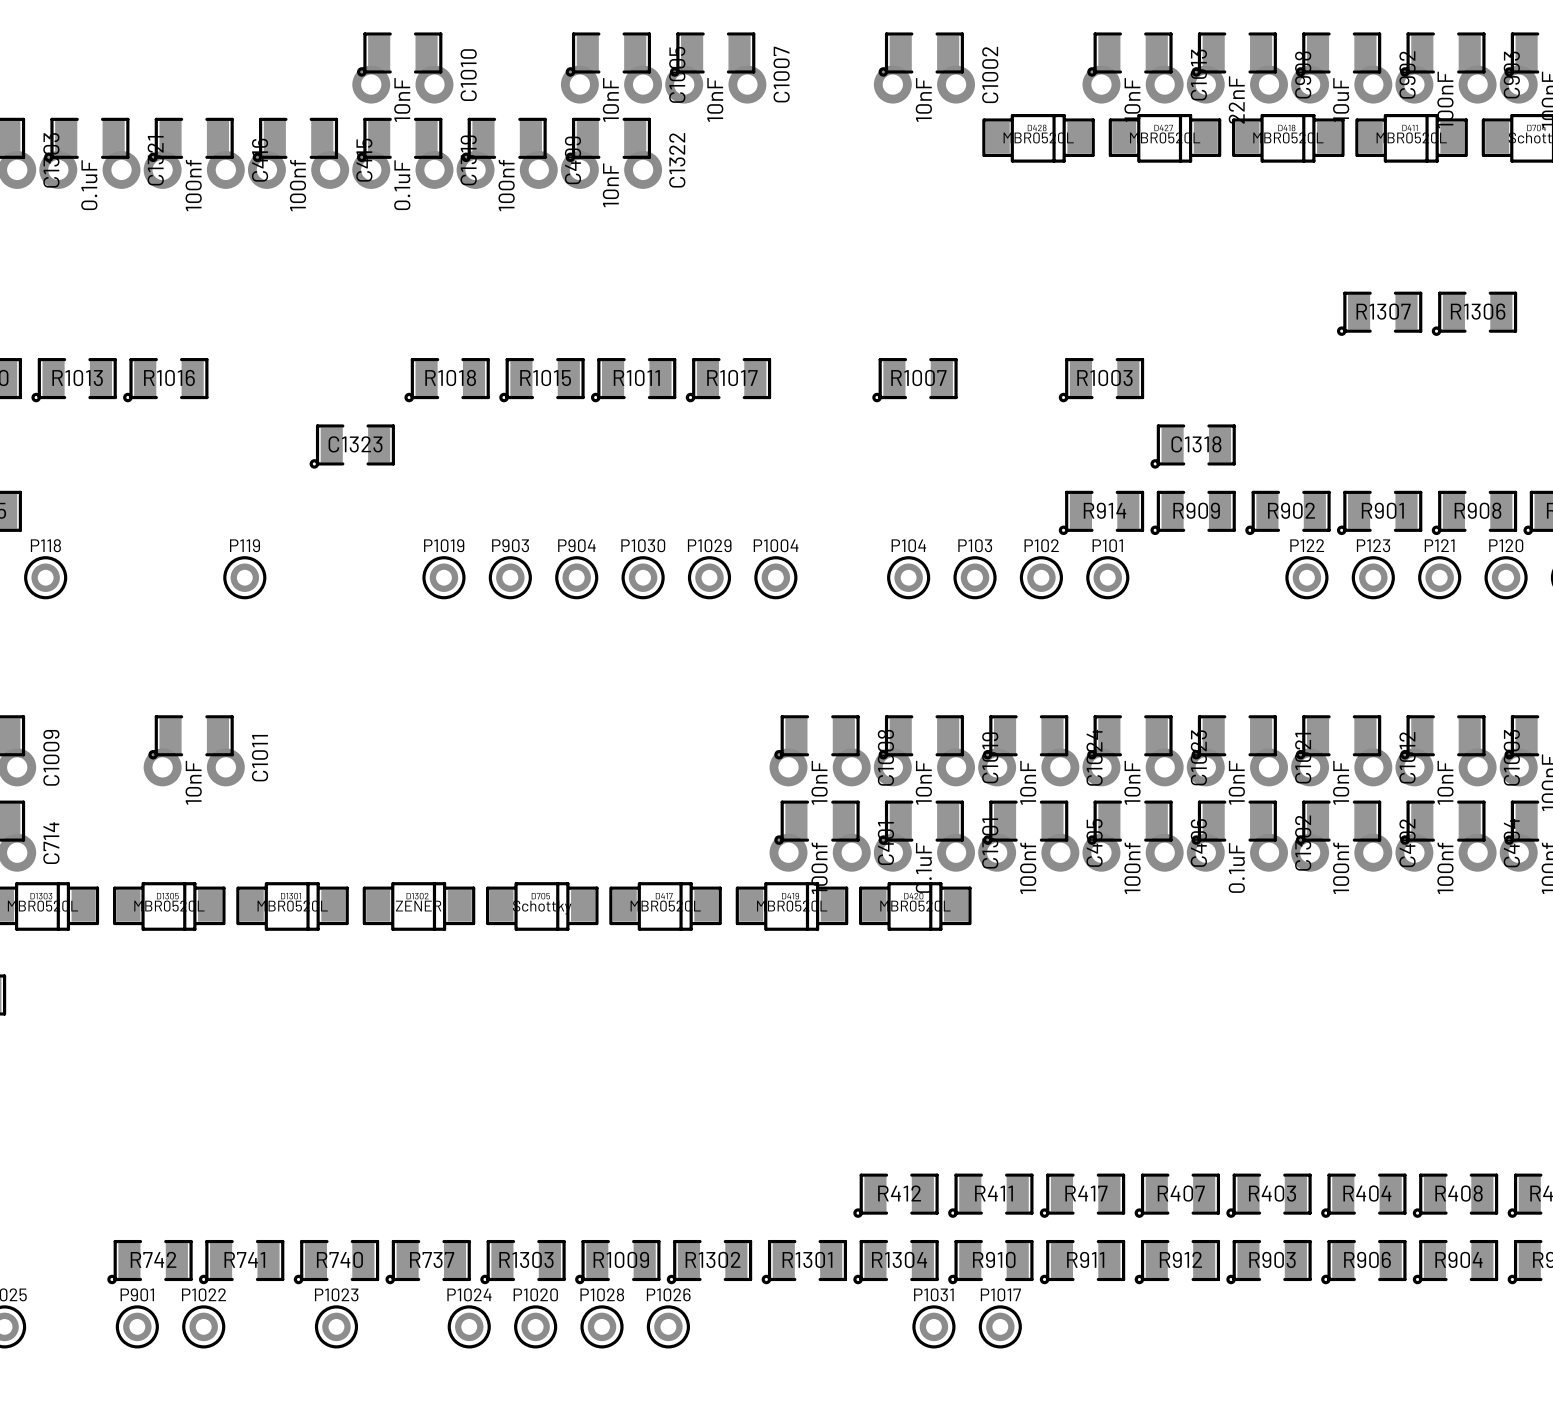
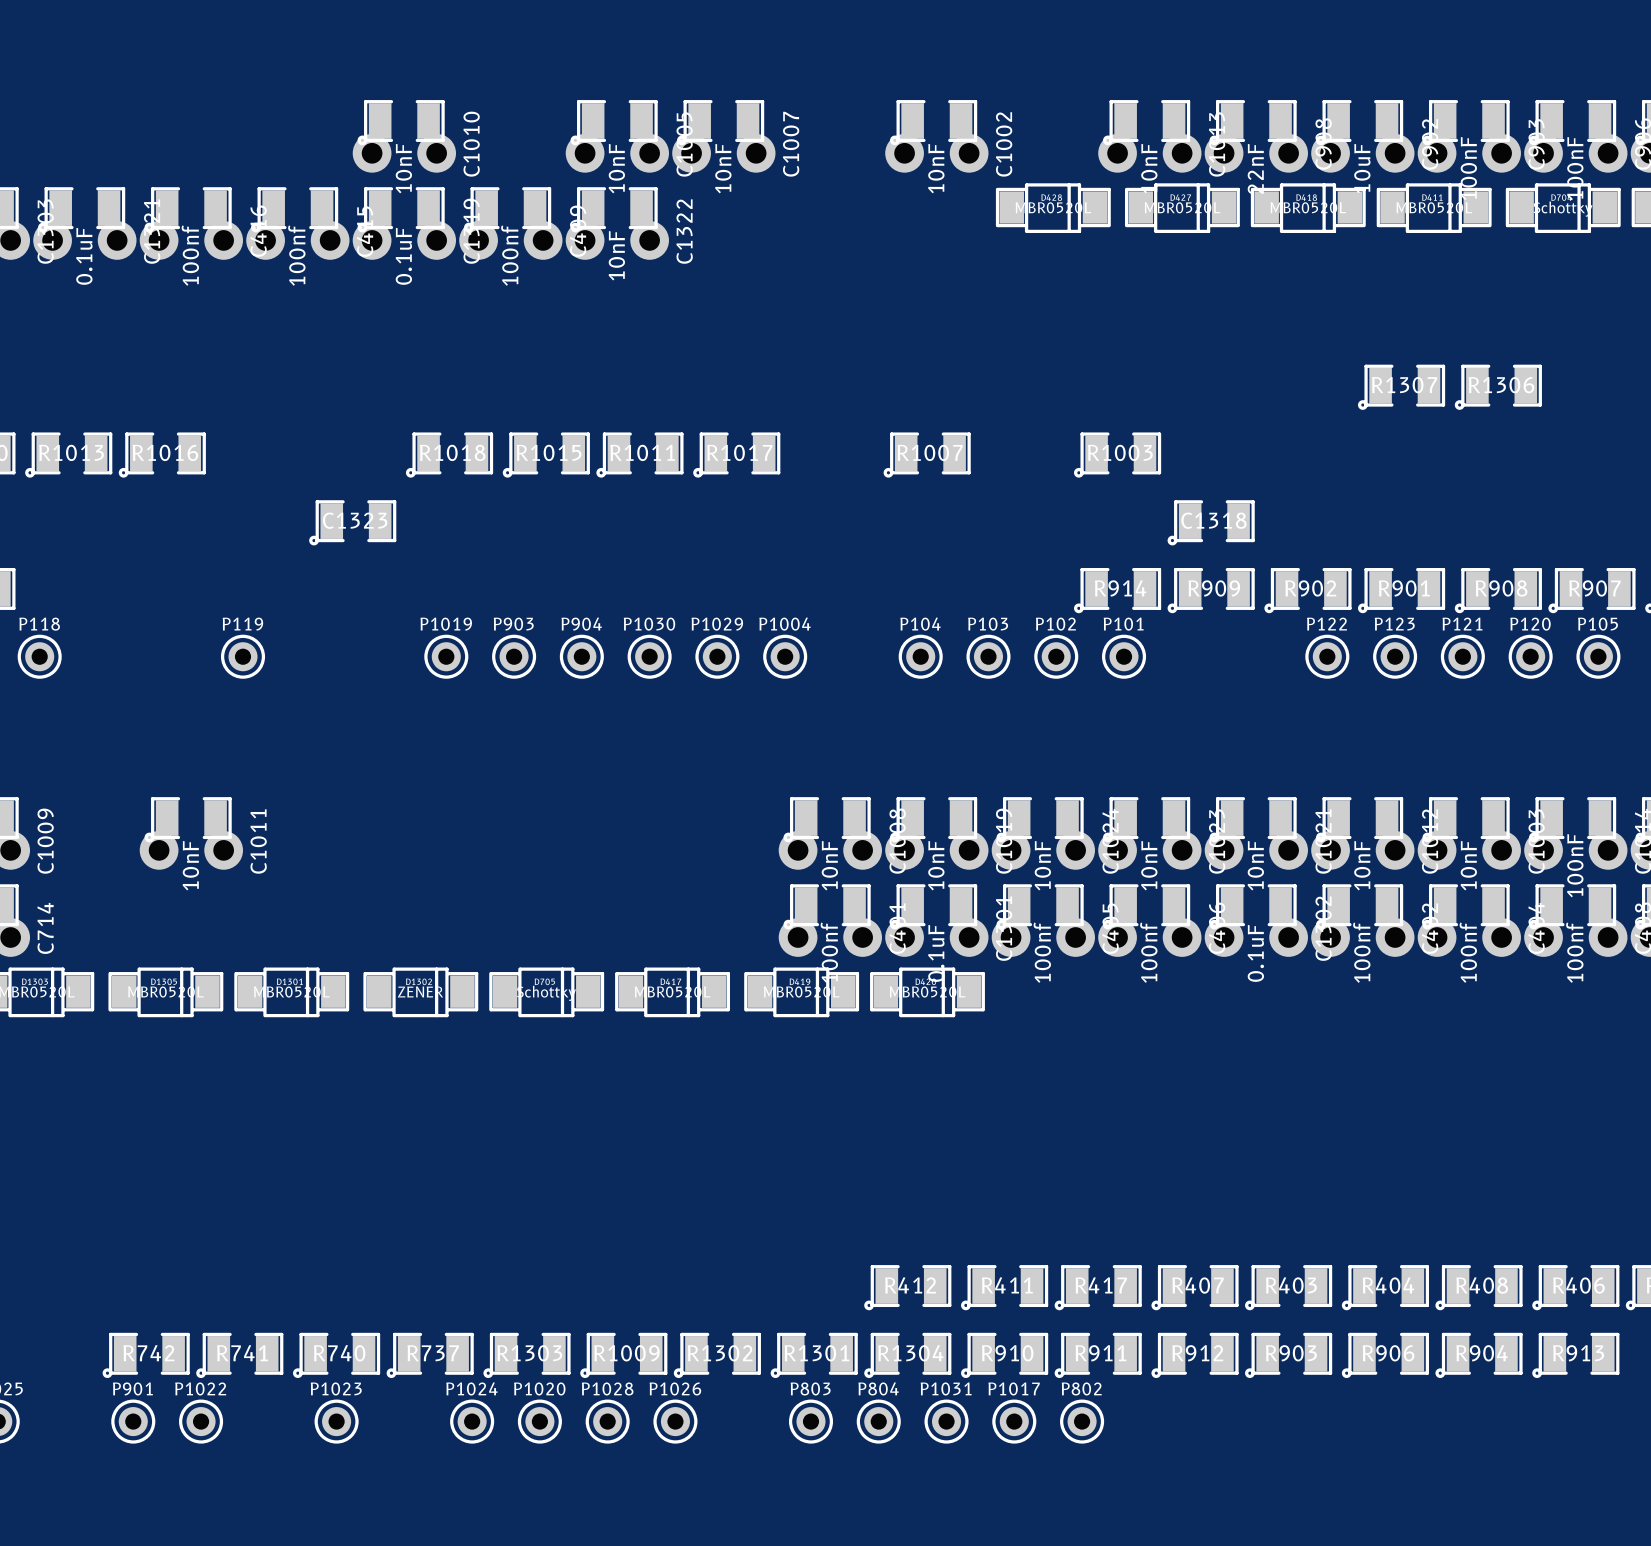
P803: none -> (810, 1421)
P804: none -> (878, 1421)
P802: none -> (1082, 1421)

